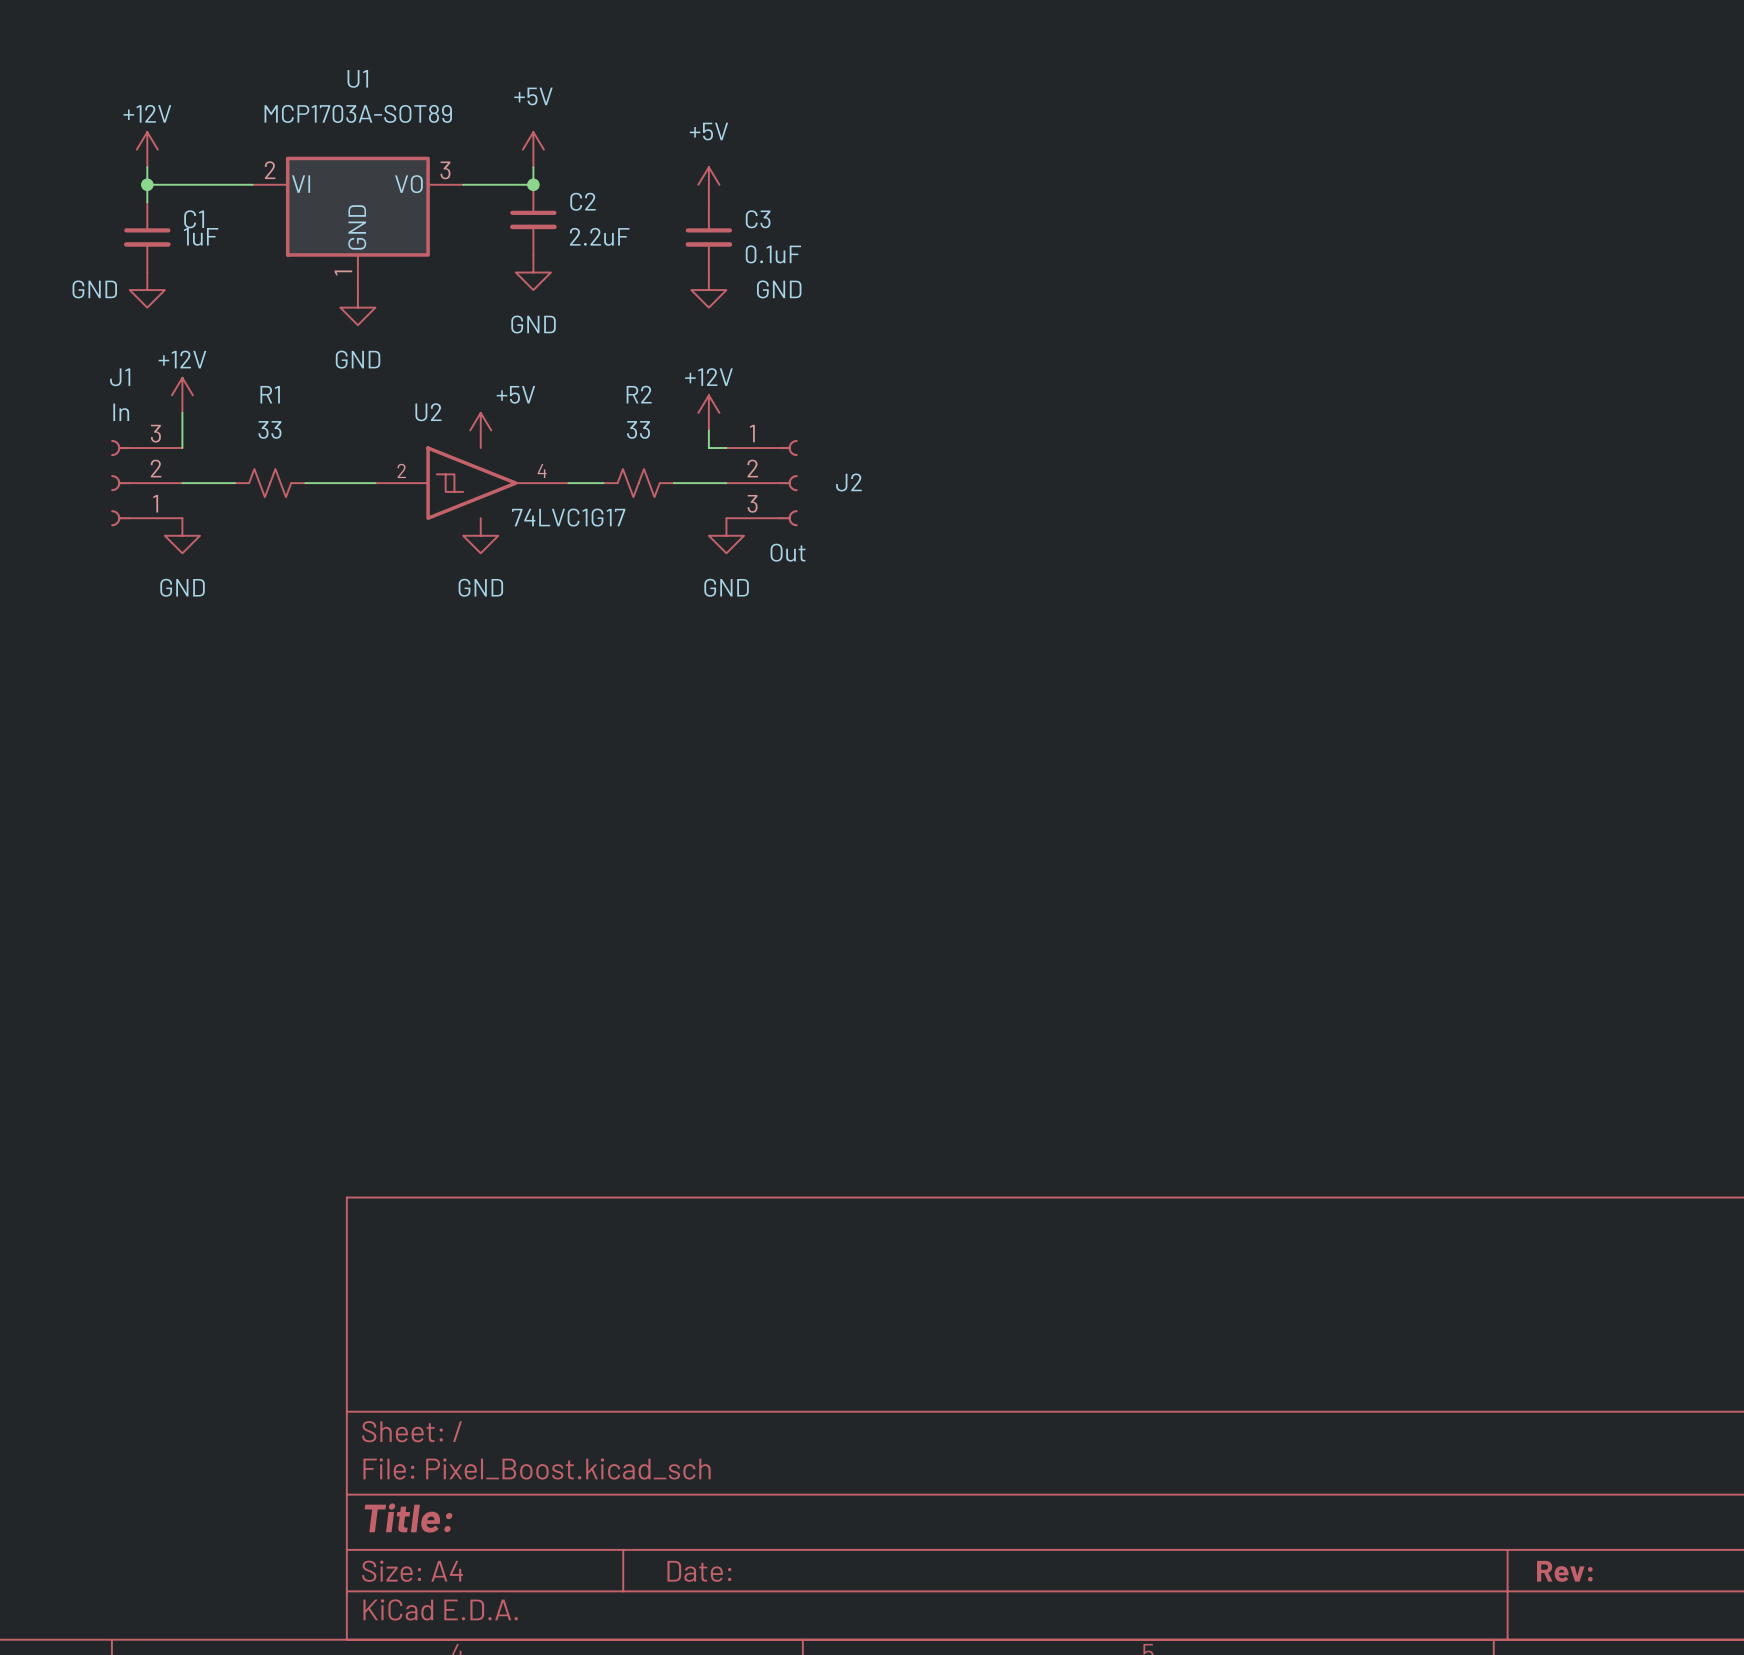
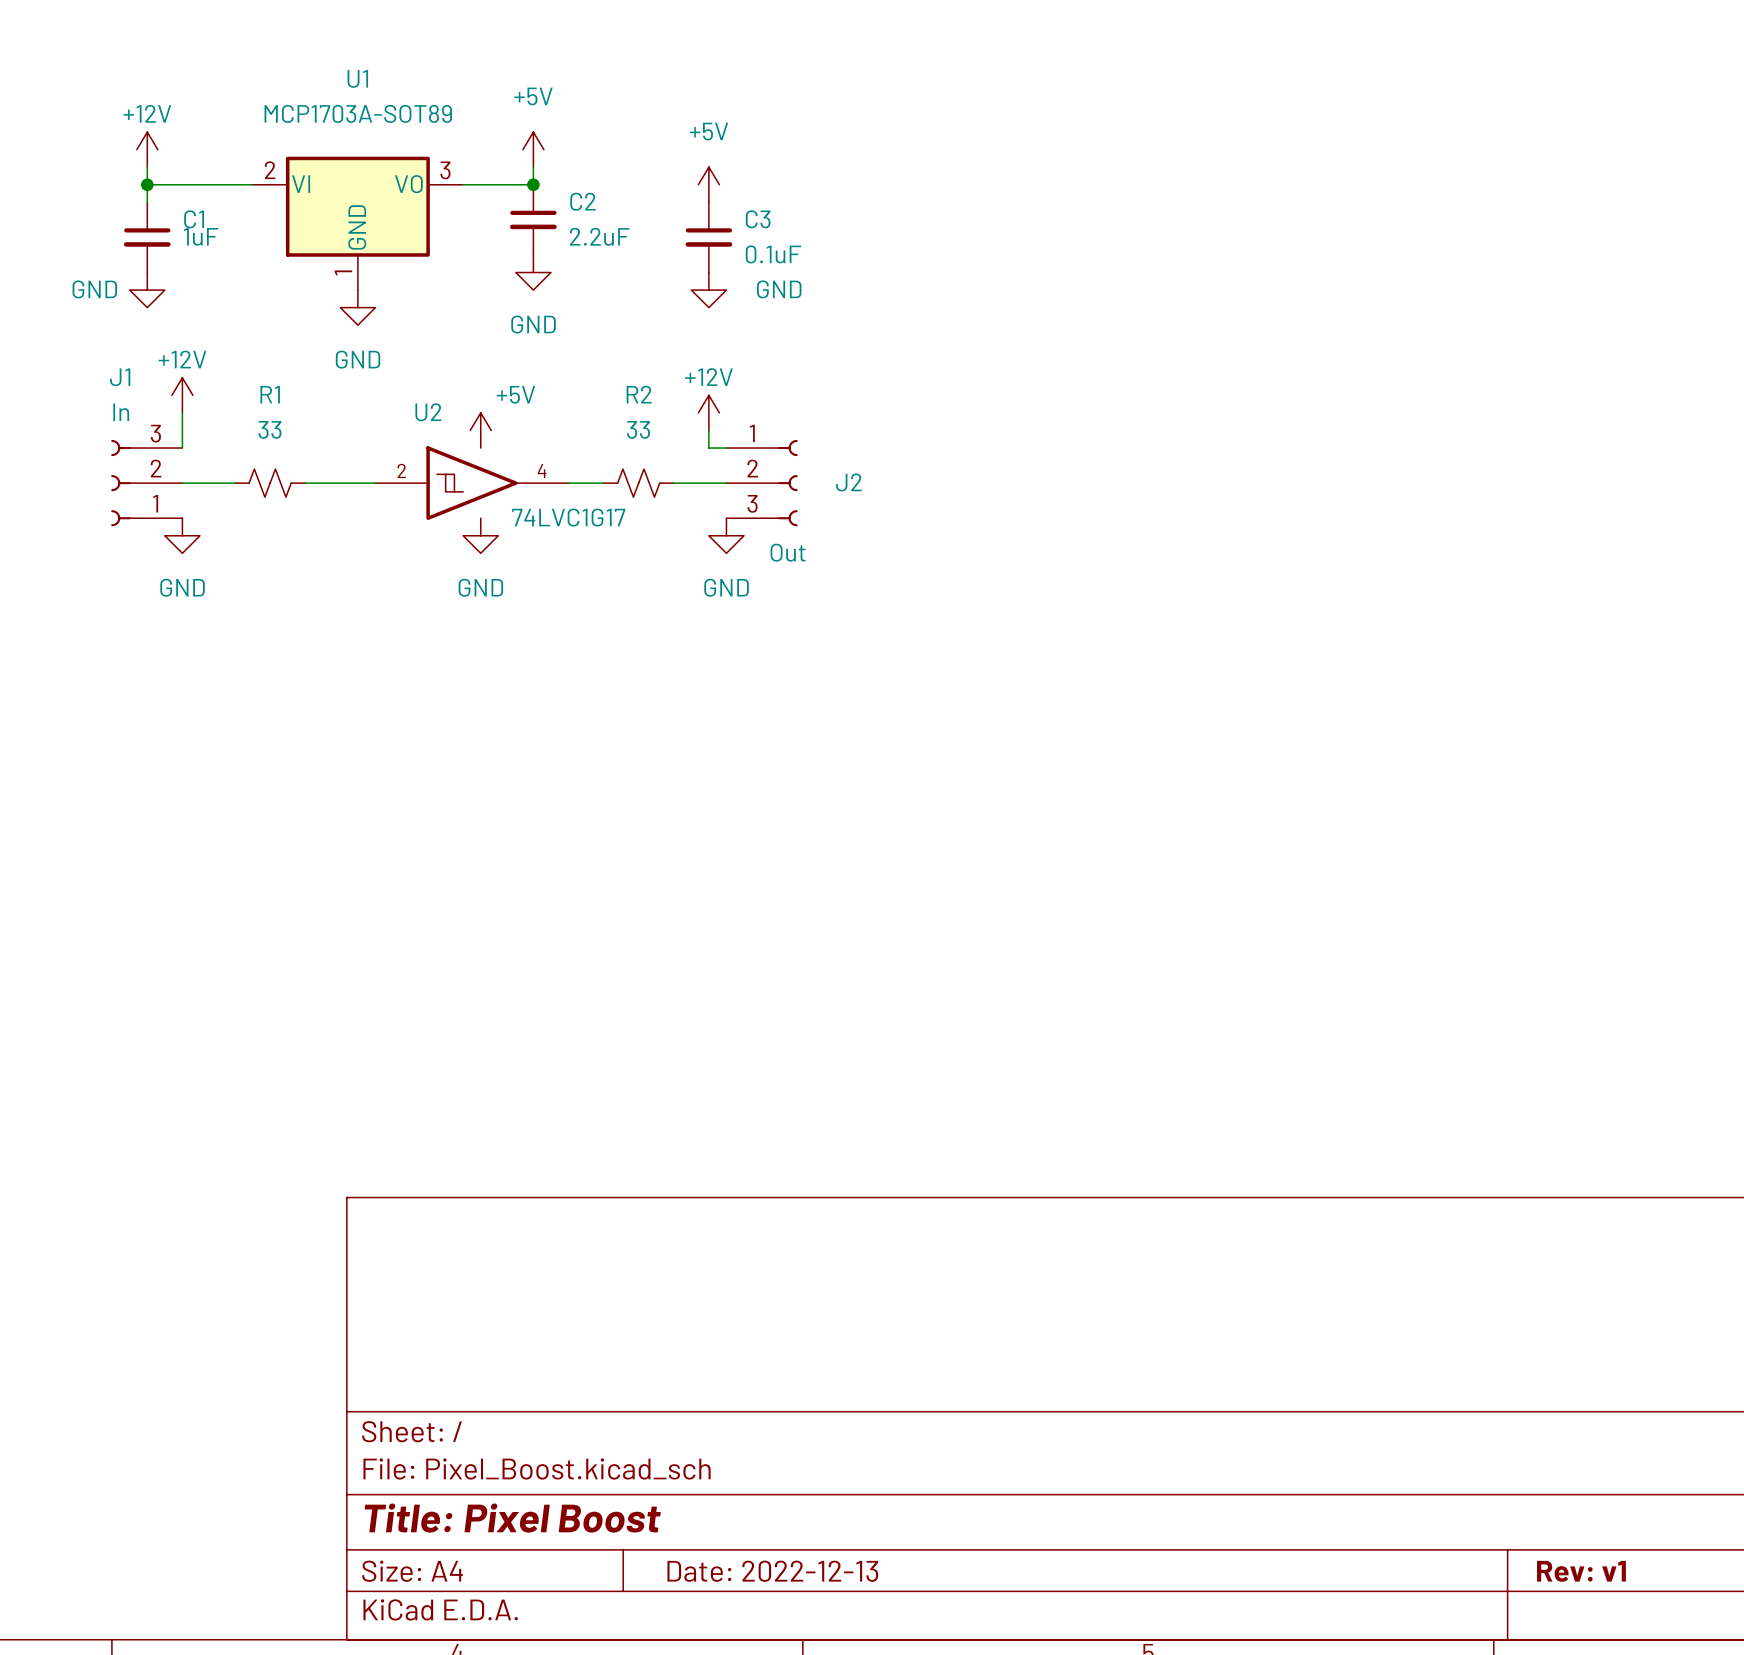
title block: Title: (408, 1518) -> Title: Pixel Boost (512, 1518)
title block: Date: (699, 1571) -> Date: 2022-12-13 (772, 1571)
title block: Rev: (1564, 1571) -> Rev: v1 (1581, 1571)

